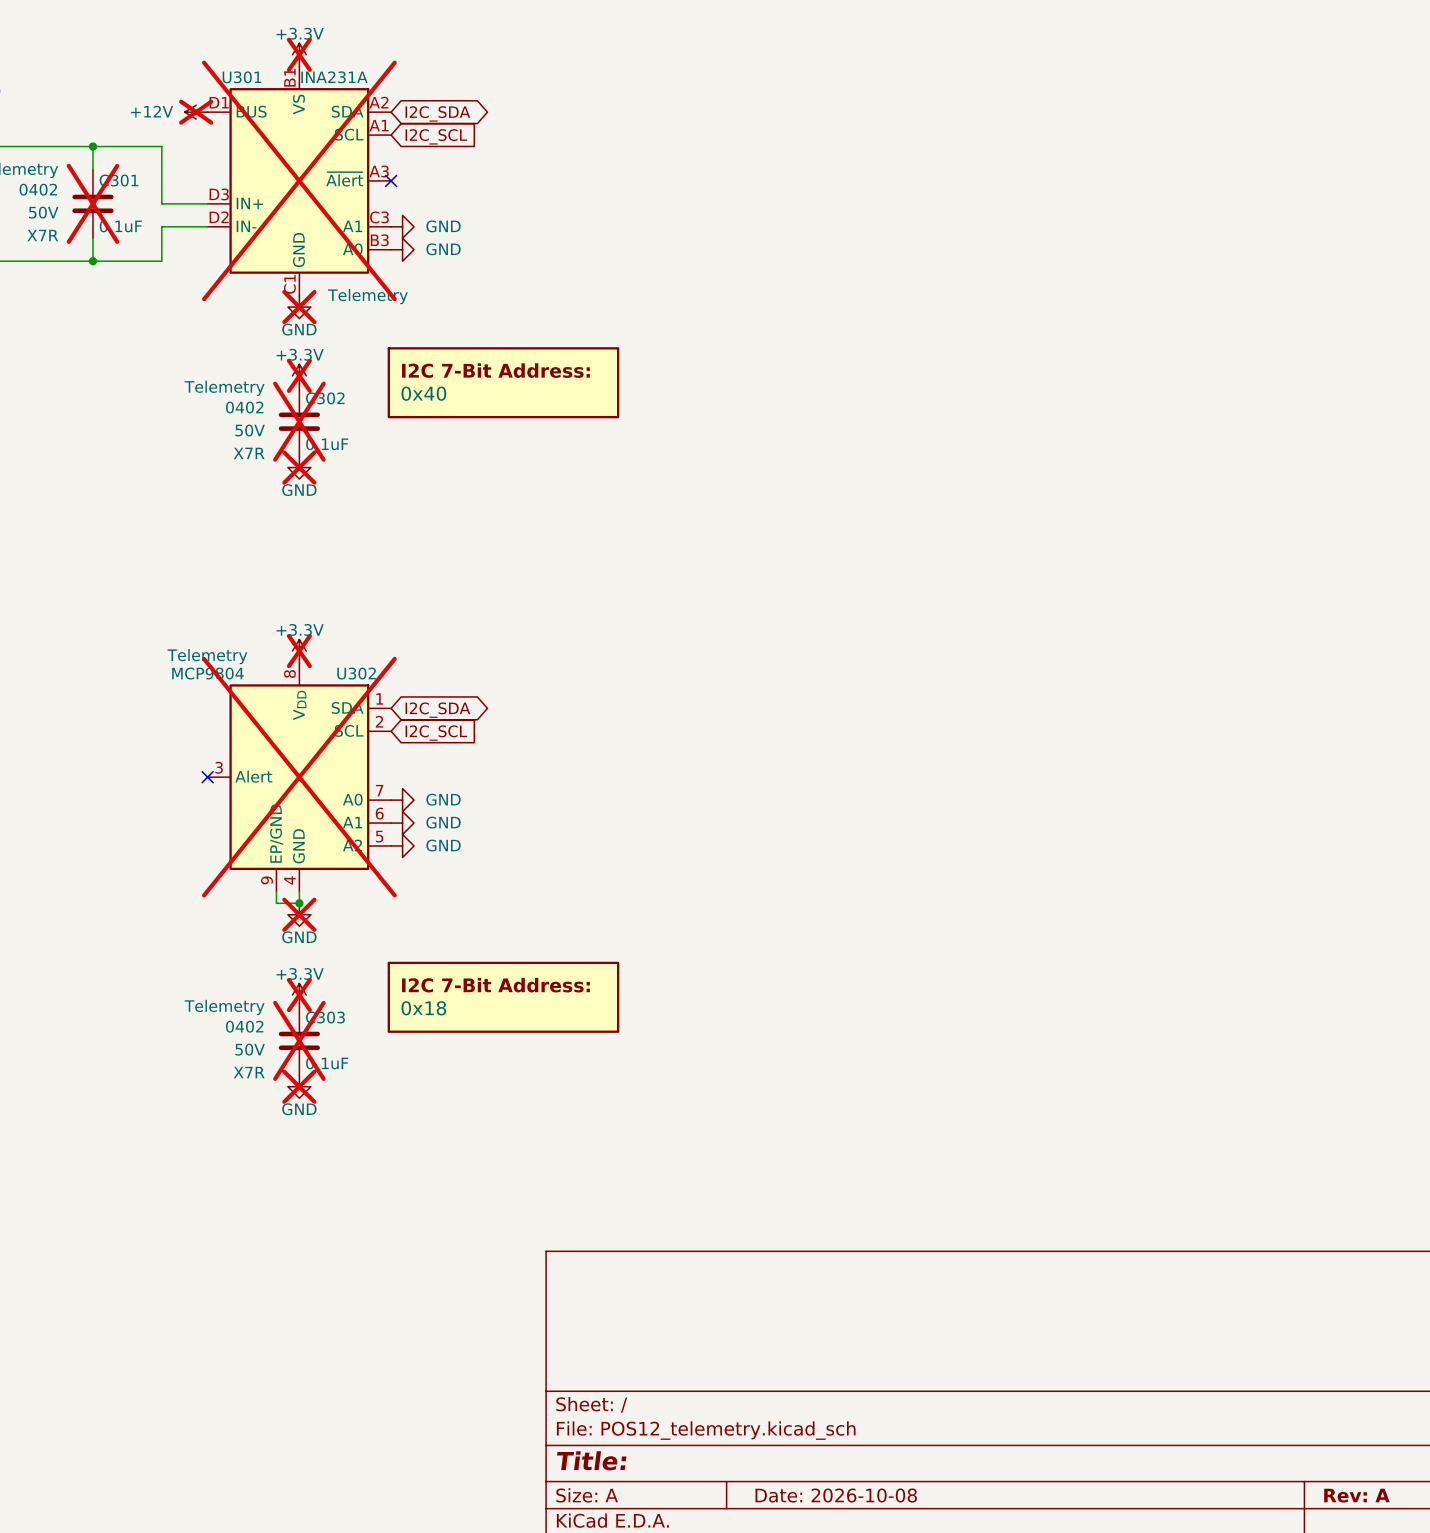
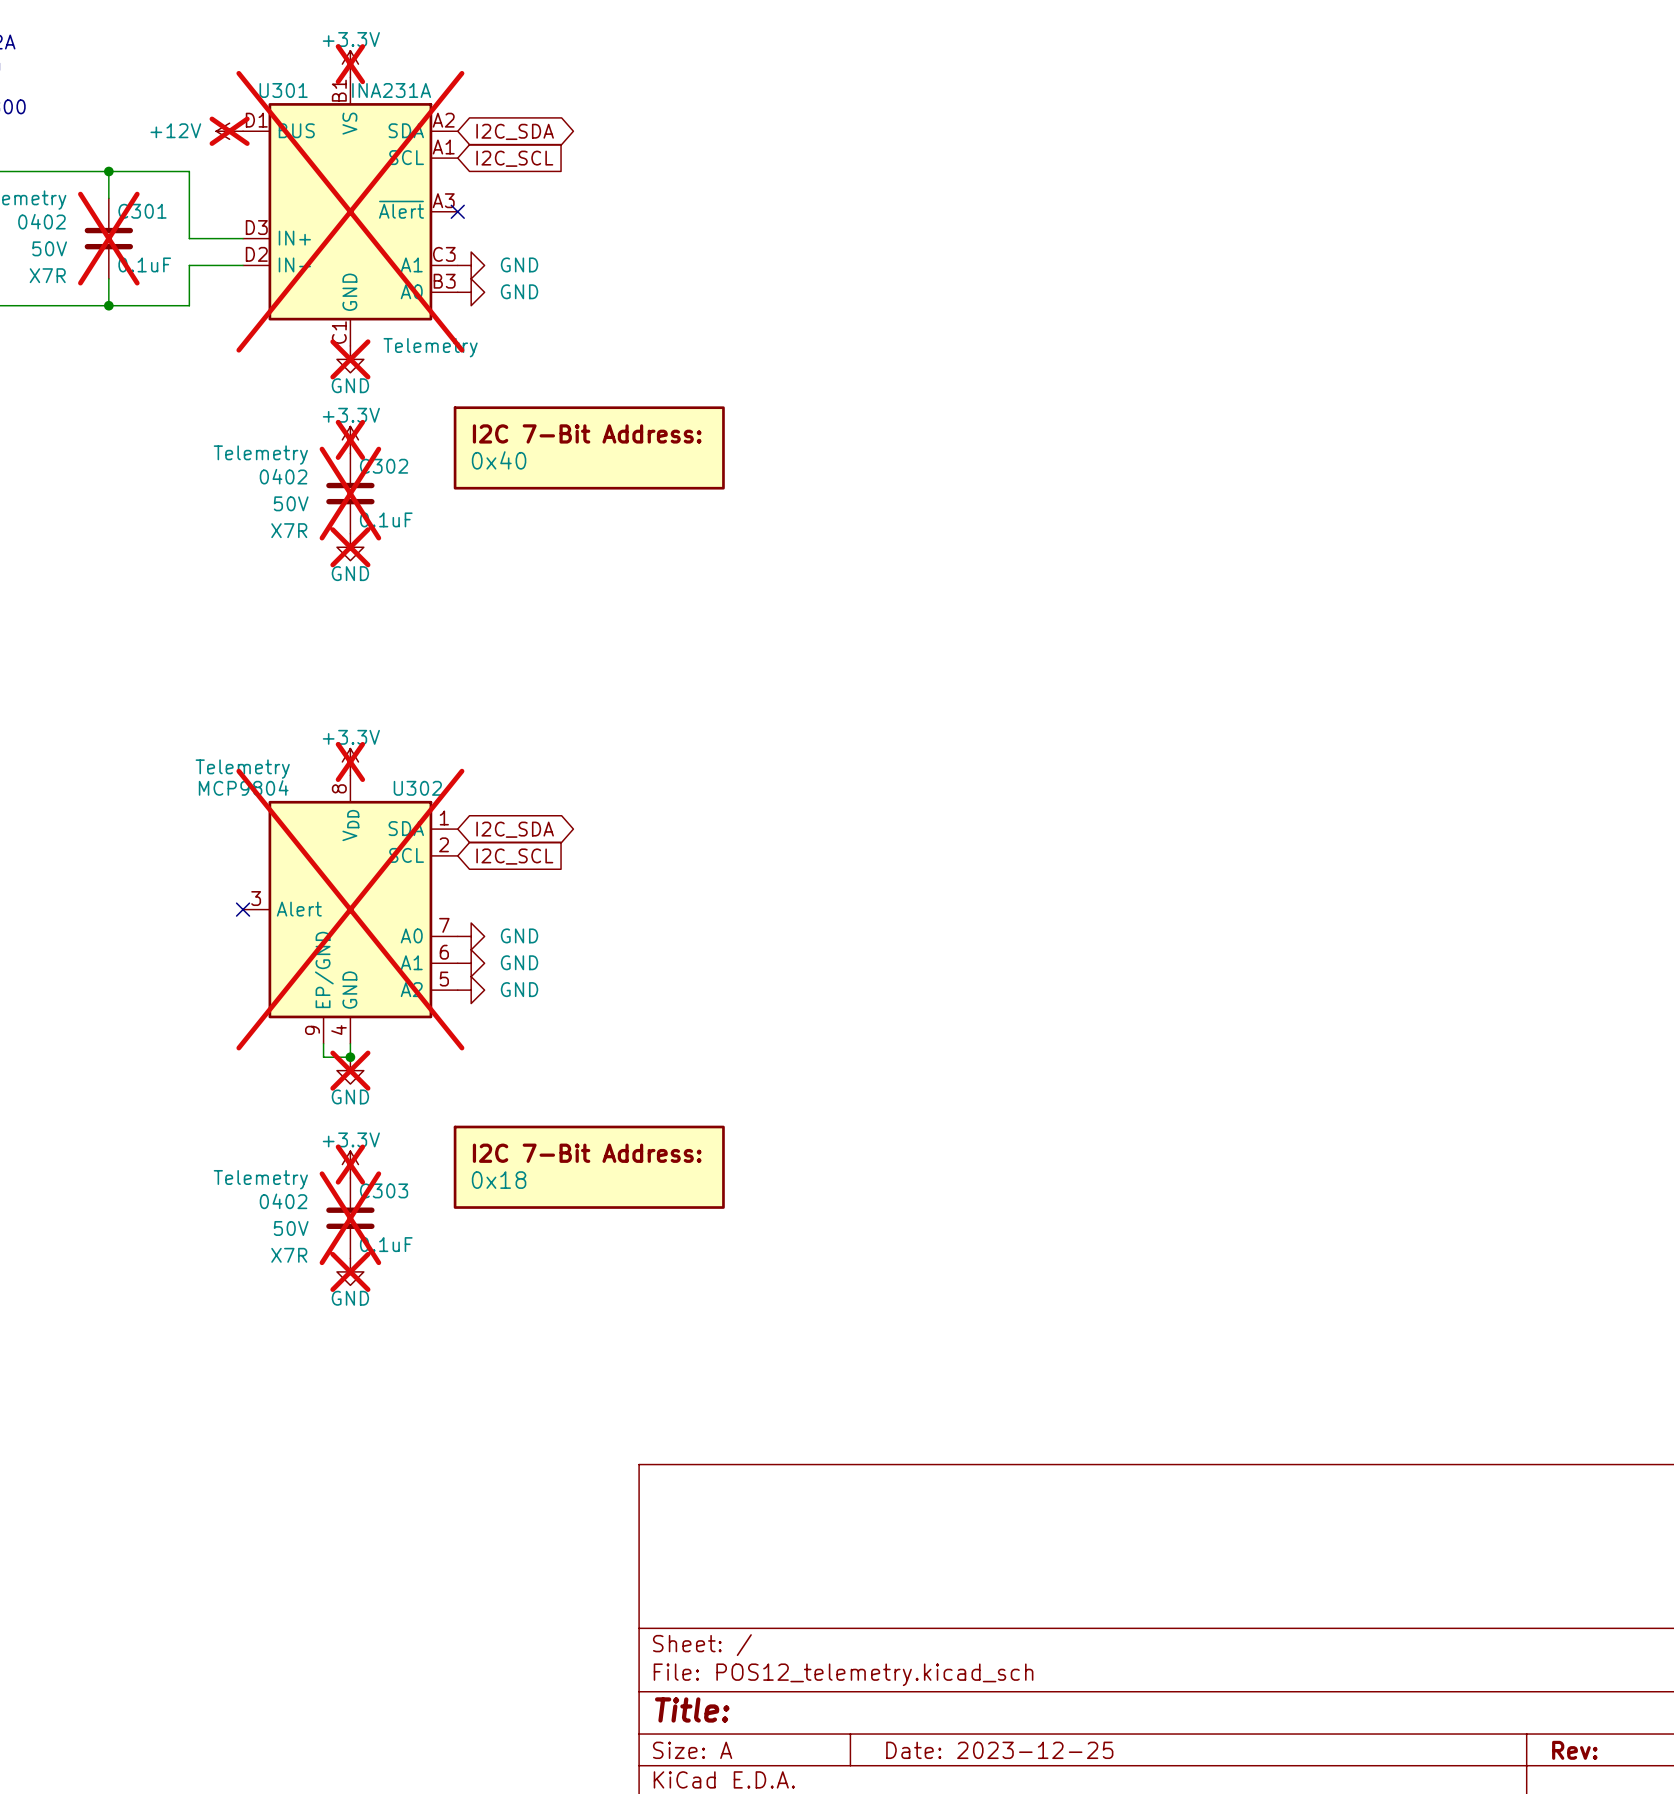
title block: Date: 2026-10-08 (836, 1495) -> Date: 2023-12-25 (999, 1750)
title block: Rev: A (1356, 1495) -> Rev: (1574, 1750)

